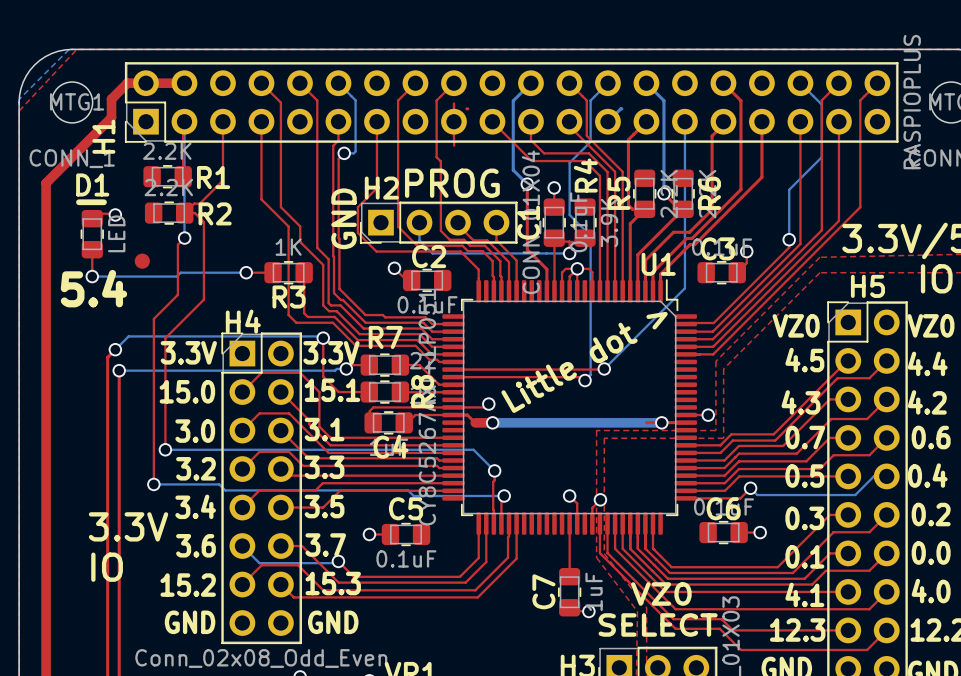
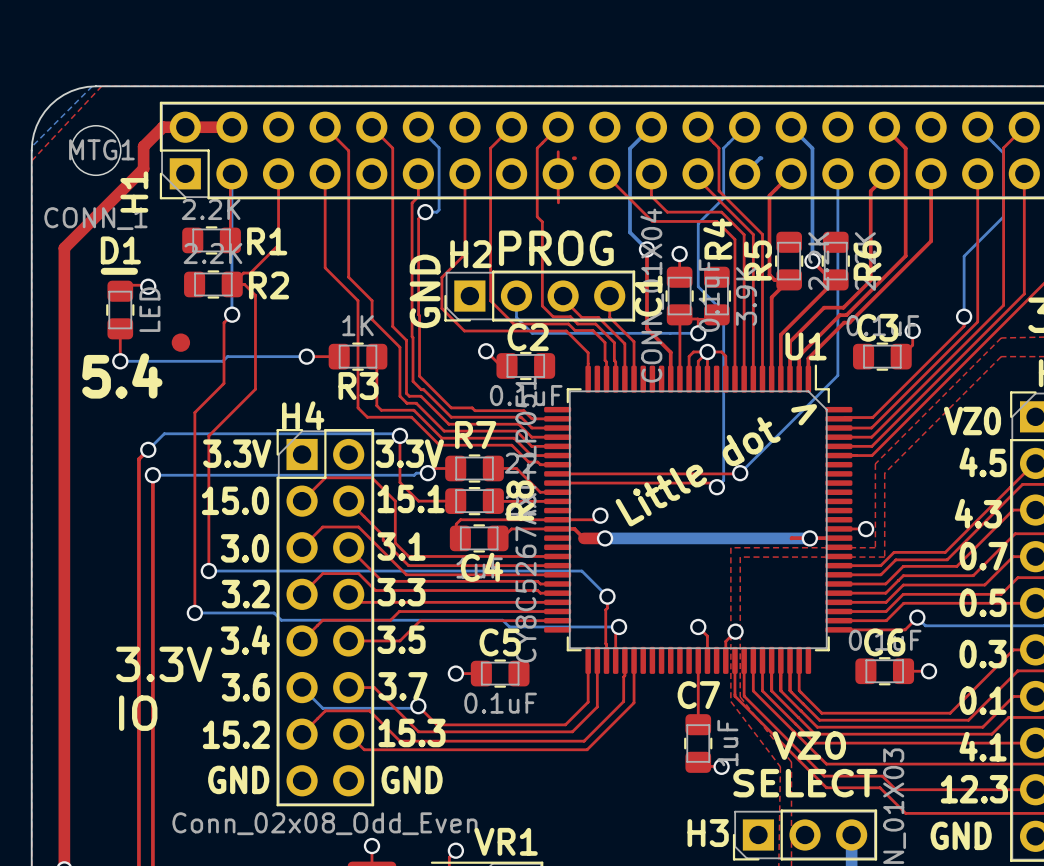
C7 name rotation: 0° (543, 591) -> 90° clockwise (698, 695)

